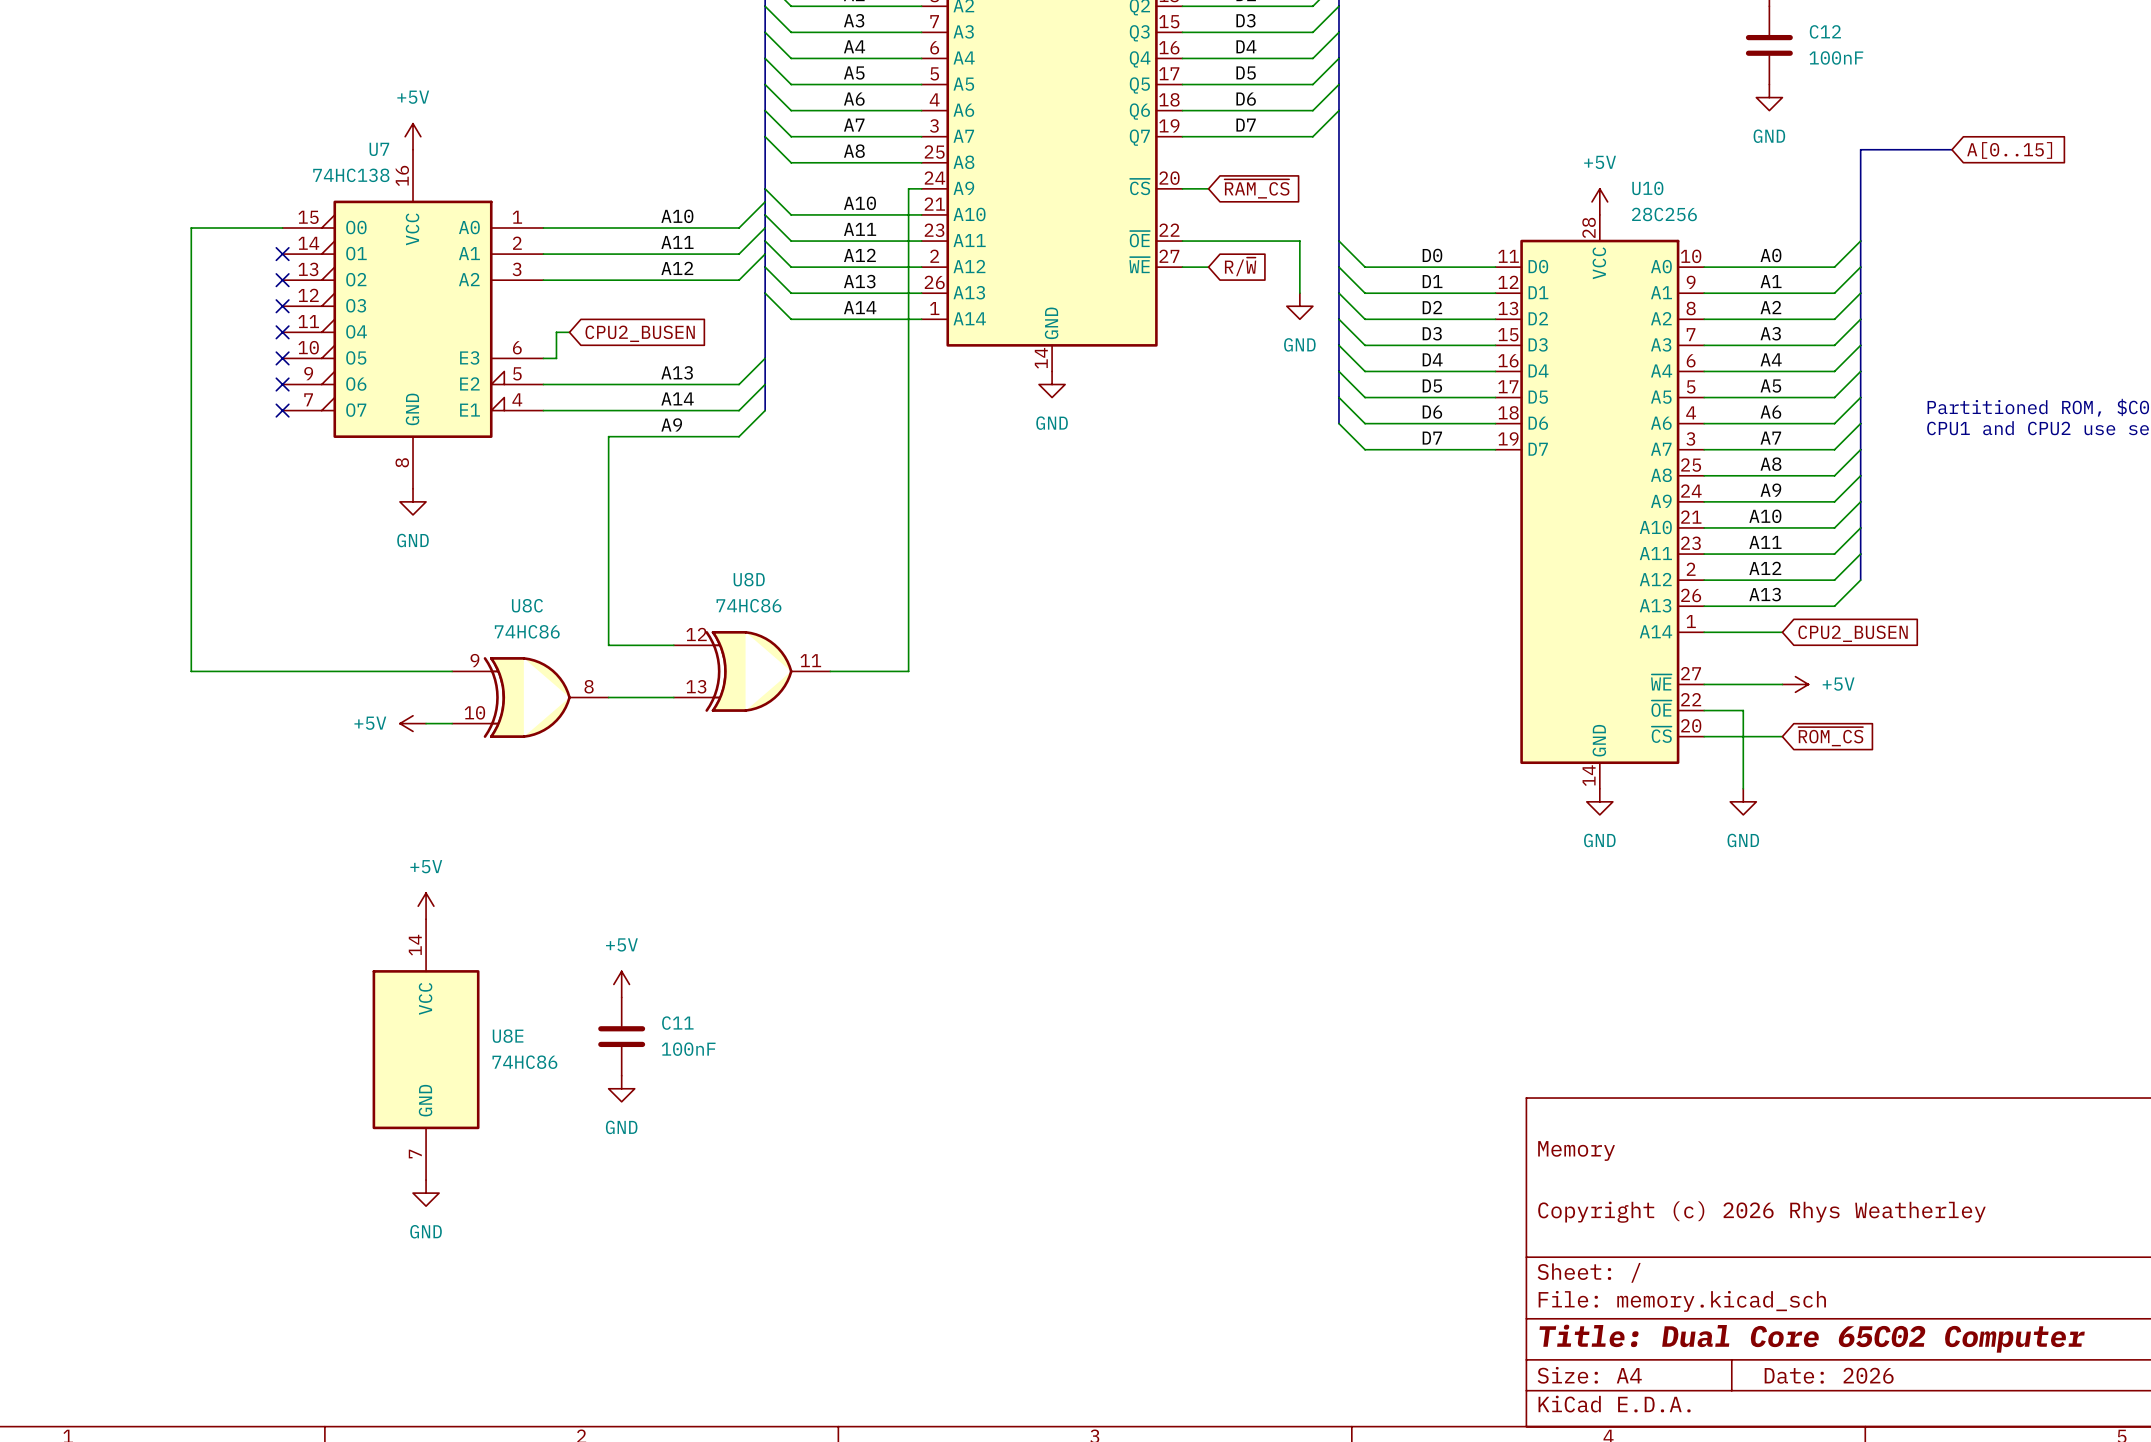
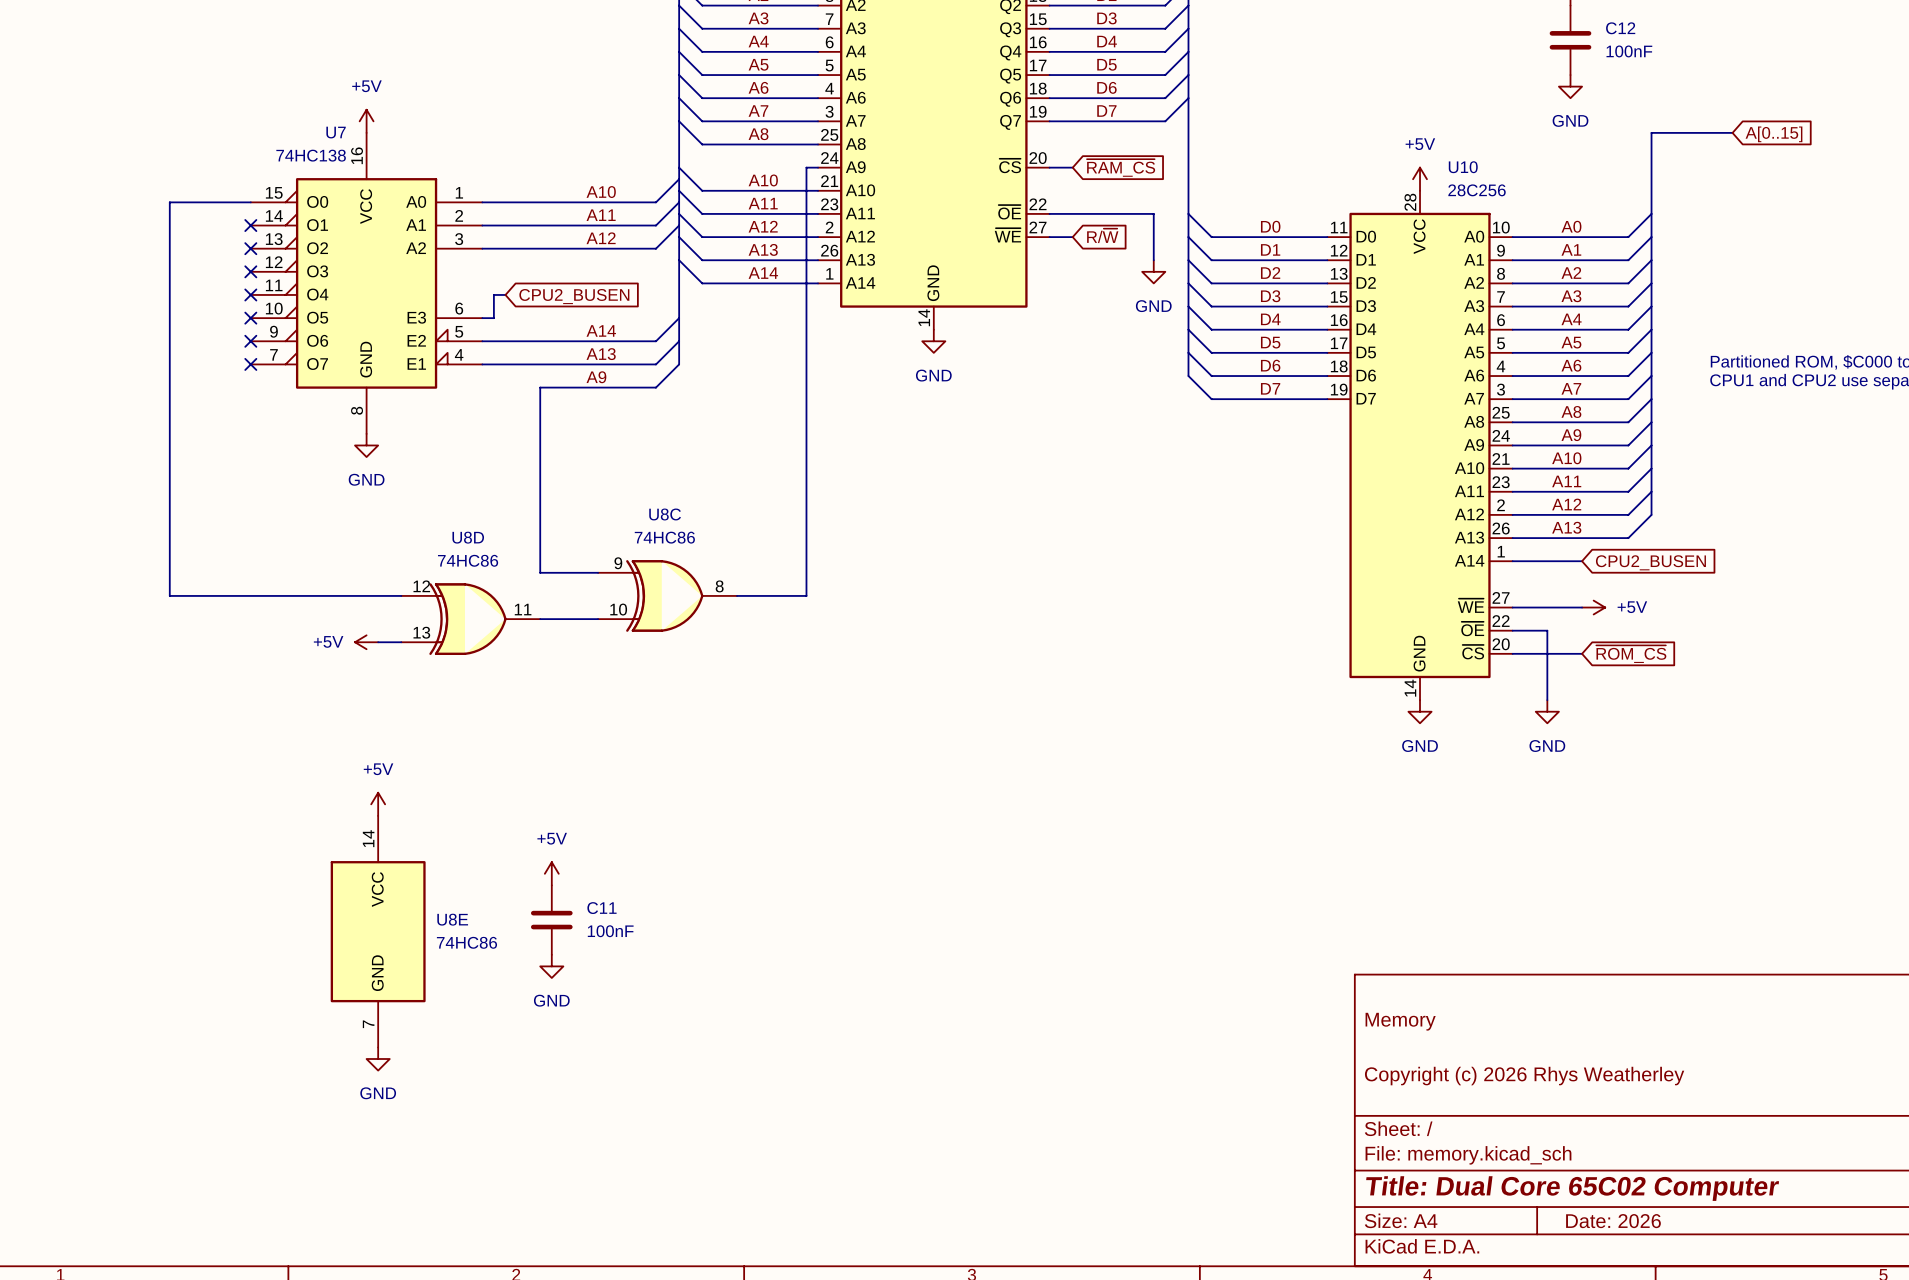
label: A13 (677, 372) -> A14 (601, 330)
label: A14 (677, 398) -> A13 (601, 354)
U8D position: (752, 671) -> (470, 619)
U8C position: (530, 697) -> (667, 595)

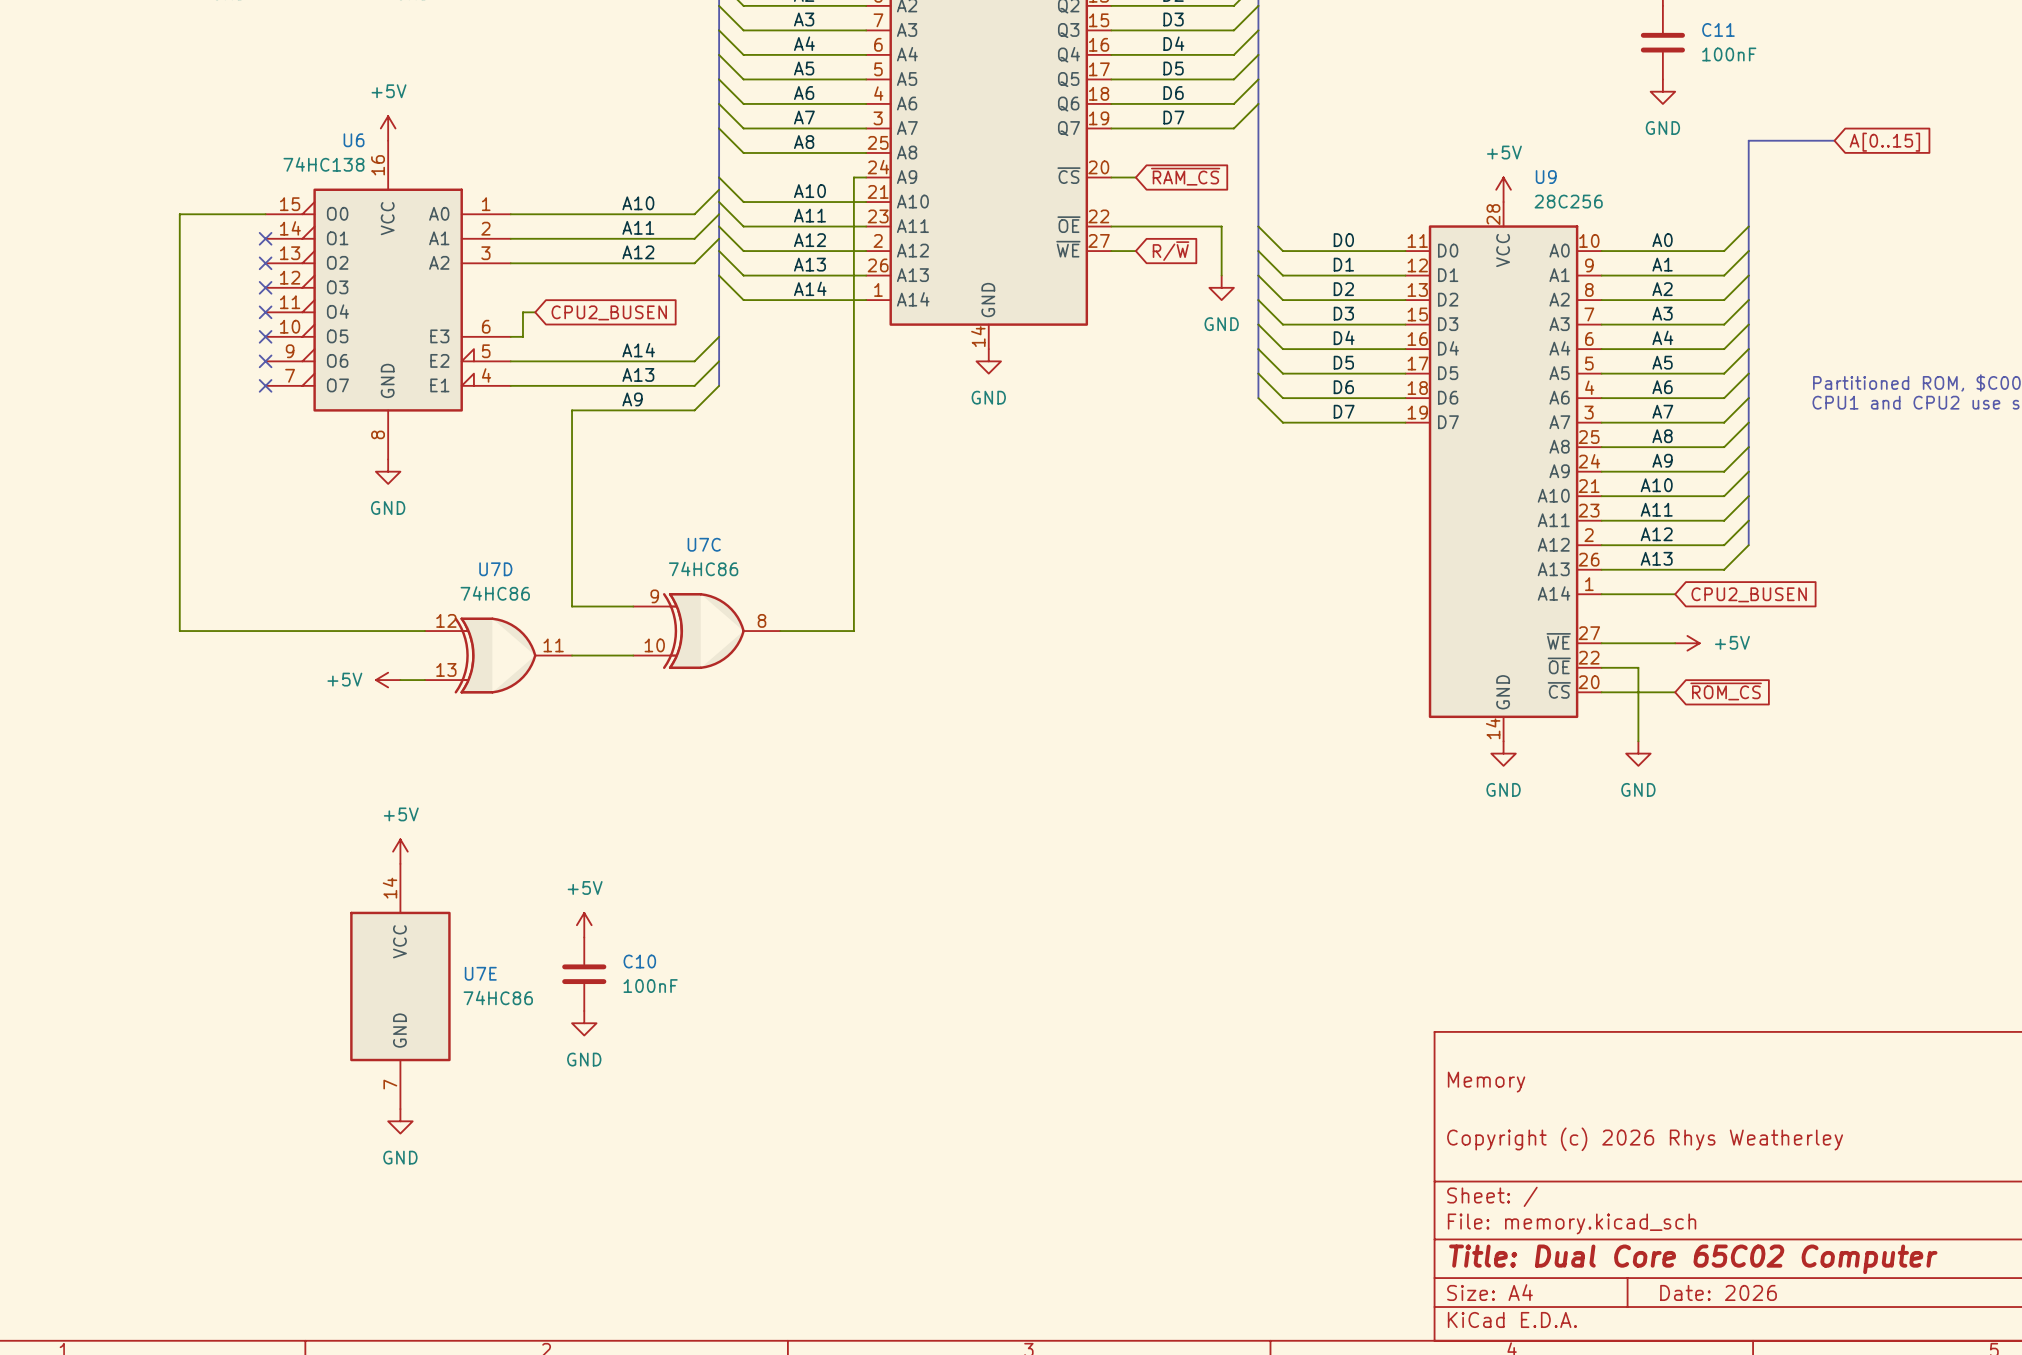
C12 name: C12 (1620, 28) -> C11 (1718, 29)
U7 name: U7 (336, 132) -> U6 (354, 140)
U10 name: U10 (1463, 167) -> U9 (1546, 177)
U8C name: U8C (665, 514) -> U7C (704, 544)
U8D name: U8D (468, 537) -> U7D (495, 569)
C11 name: C11 (601, 908) -> C10 (639, 961)
U8E name: U8E (452, 919) -> U7E (480, 973)

